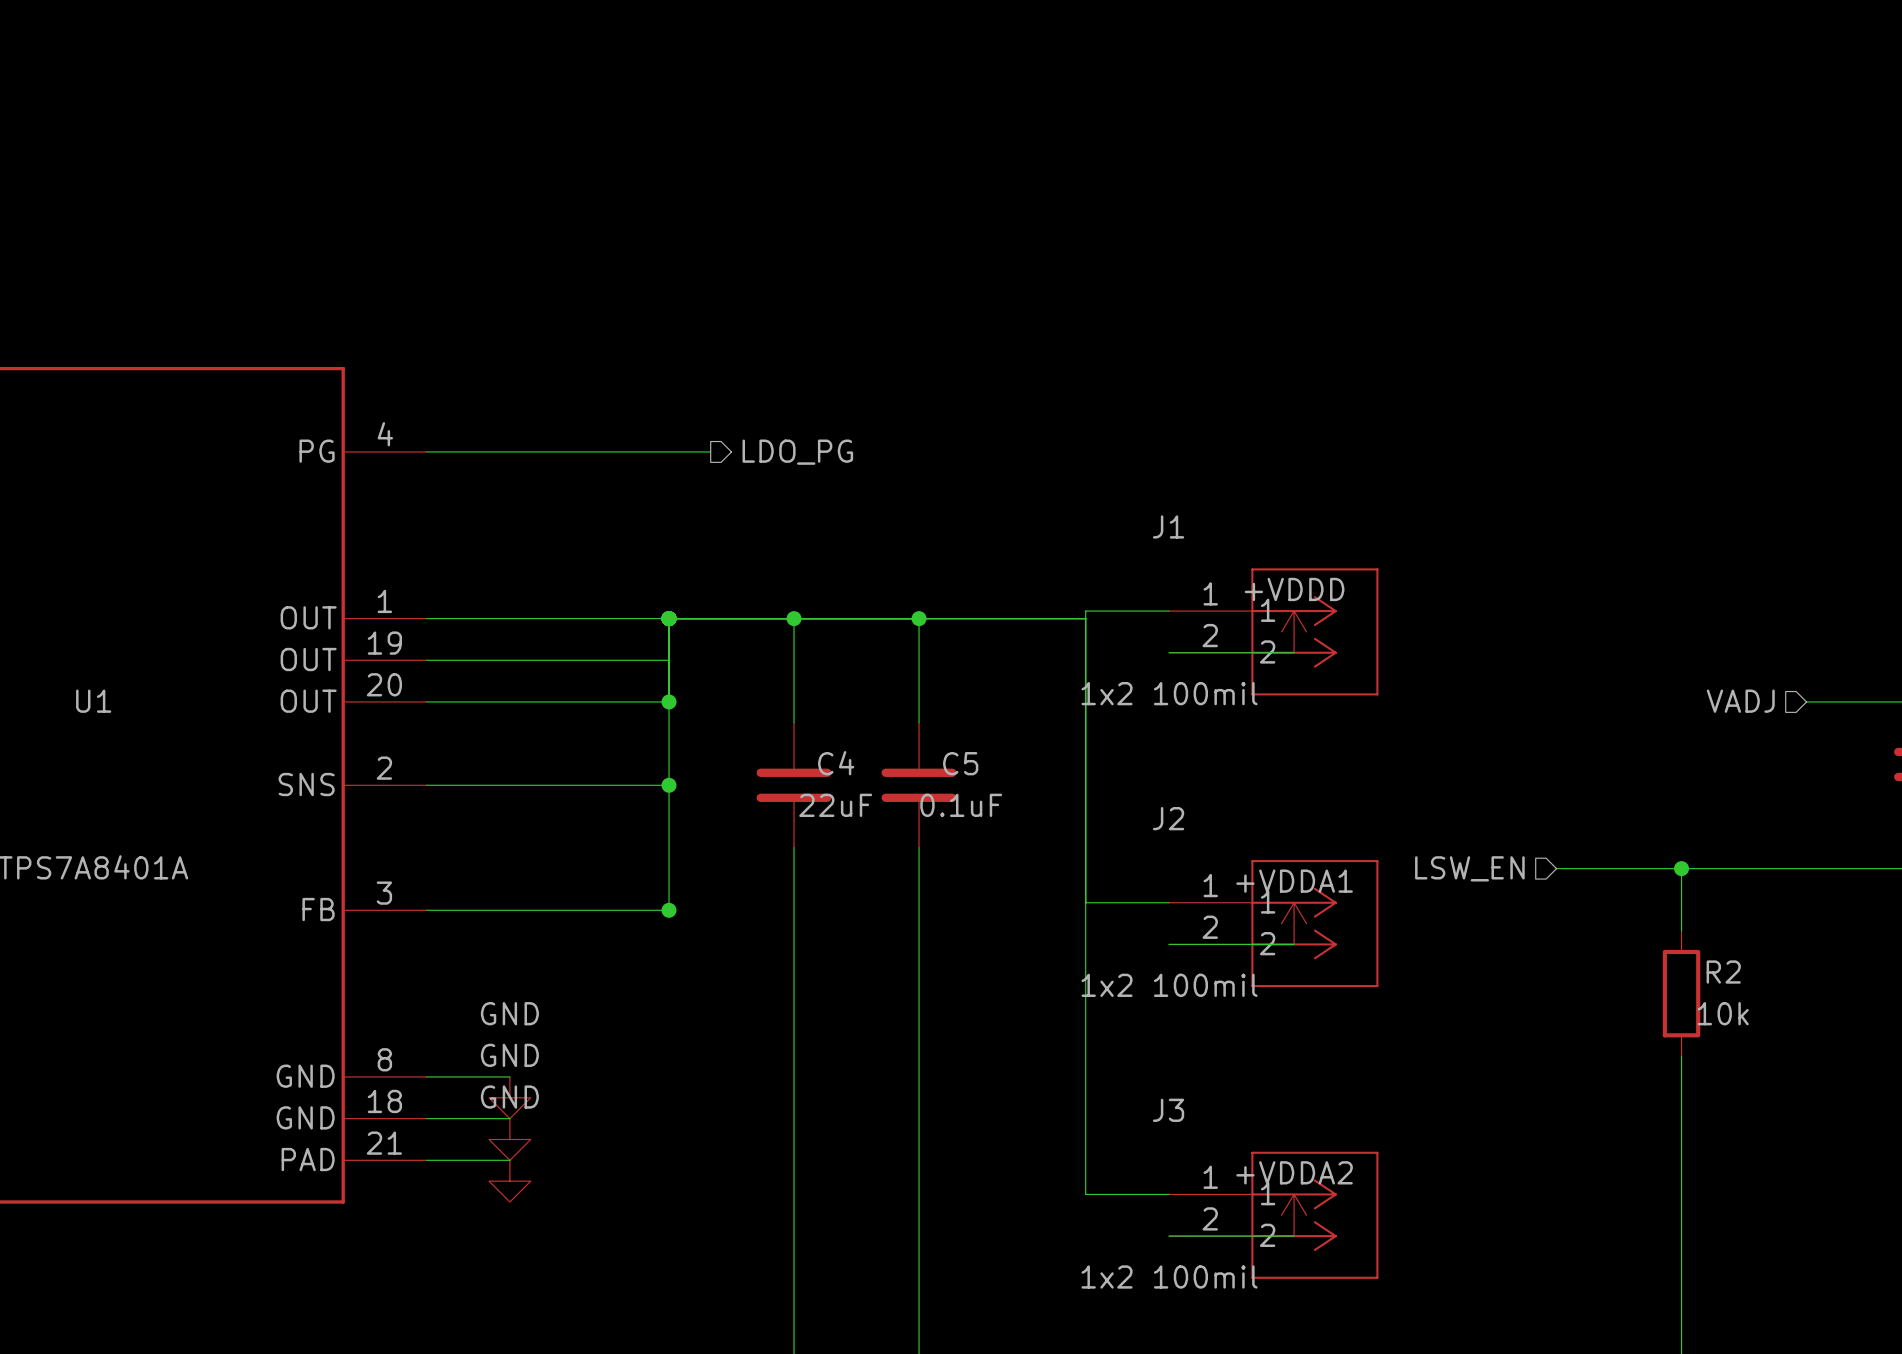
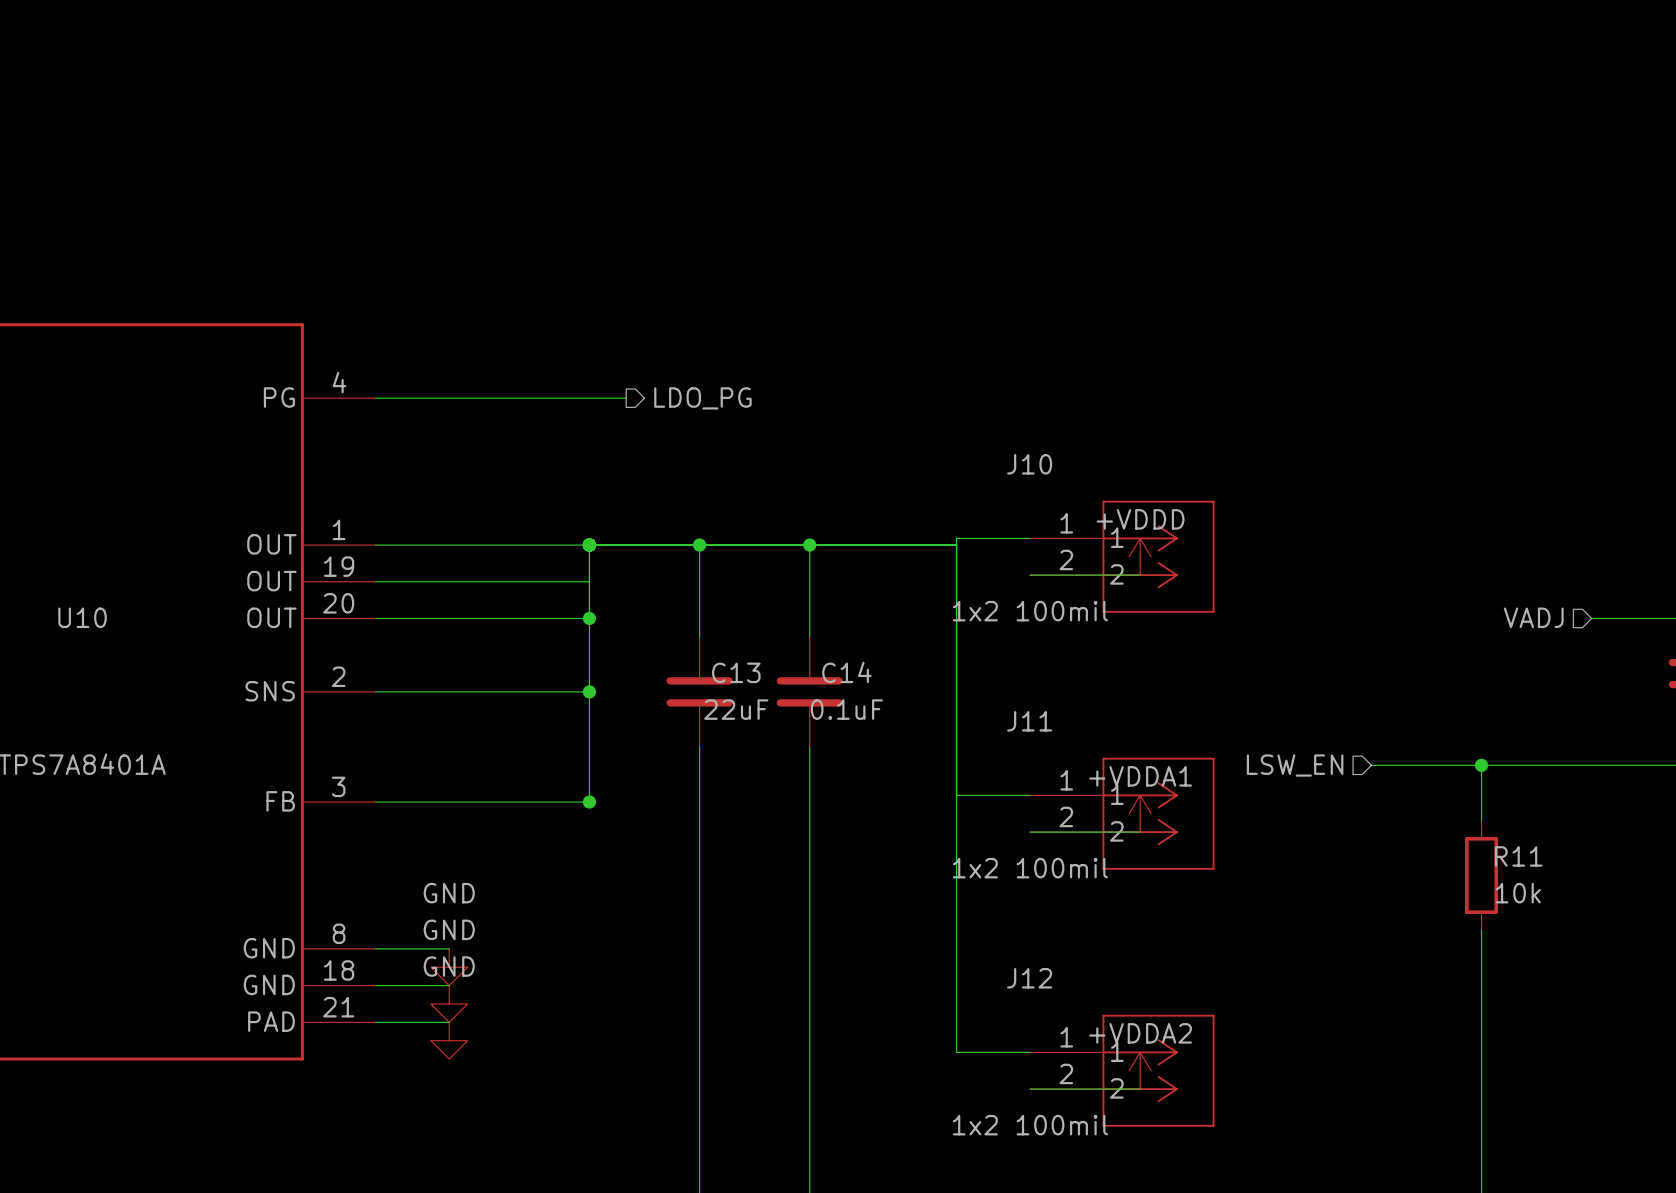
J1 name: J1 (1168, 526) -> J10 (1029, 464)
U1 name: U1 (93, 701) -> U10 (82, 617)
C4 name: C4 (836, 763) -> C13 (736, 672)
C5 name: C5 (960, 763) -> C14 (846, 672)
J2 name: J2 (1168, 818) -> J11 (1029, 721)
R2 name: R2 (1723, 972) -> R11 (1518, 856)
J3 name: J3 (1168, 1110) -> J12 (1029, 978)

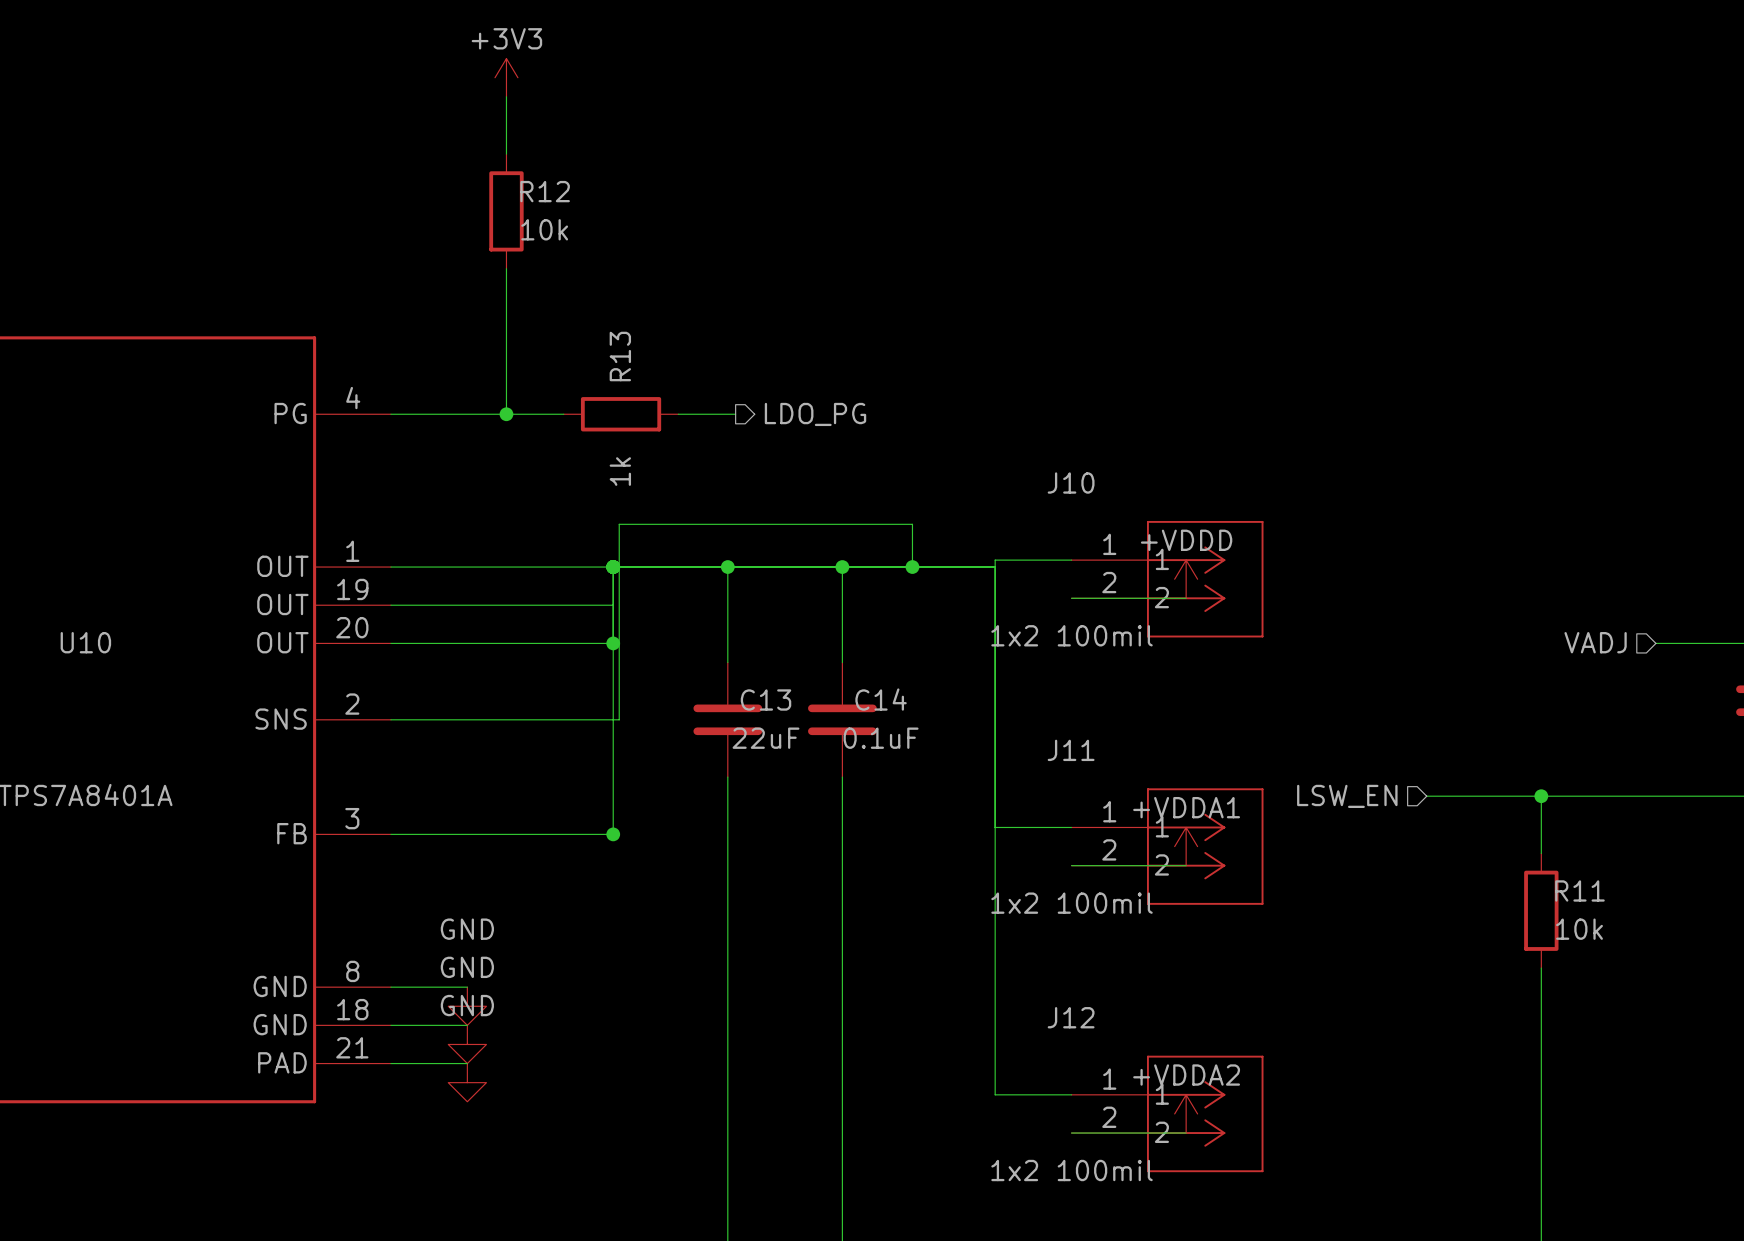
power symbol: none -> +3V3 (506, 77)
wire: none -> (506, 96) (506, 154)
R12: none -> 10k (506, 211)
wire: none -> (506, 268) (506, 414)
junction: none -> (506, 414)
wire: (541, 398) (626, 398) -> none
R13: none -> 1k (621, 414)
wire: none -> (678, 414) (735, 414)
hierarchical label position: LDO_PG (702, 398) -> LDO_PG (815, 414)
wire: none -> (912, 567) (912, 524) (619, 524) (619, 719) (613, 719)
junction: none -> (912, 567)
junction: (589, 691) -> none

